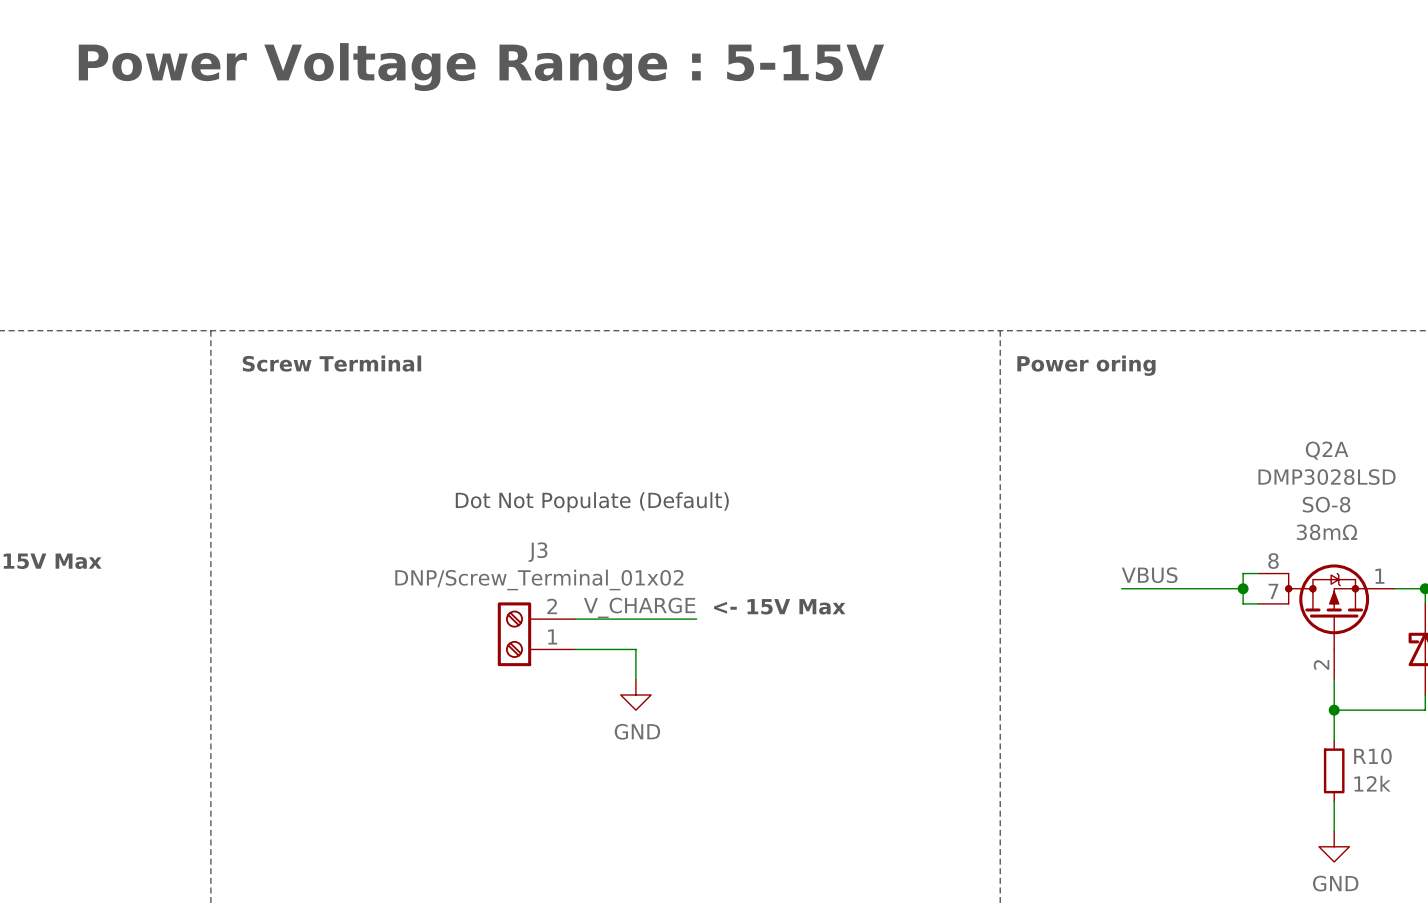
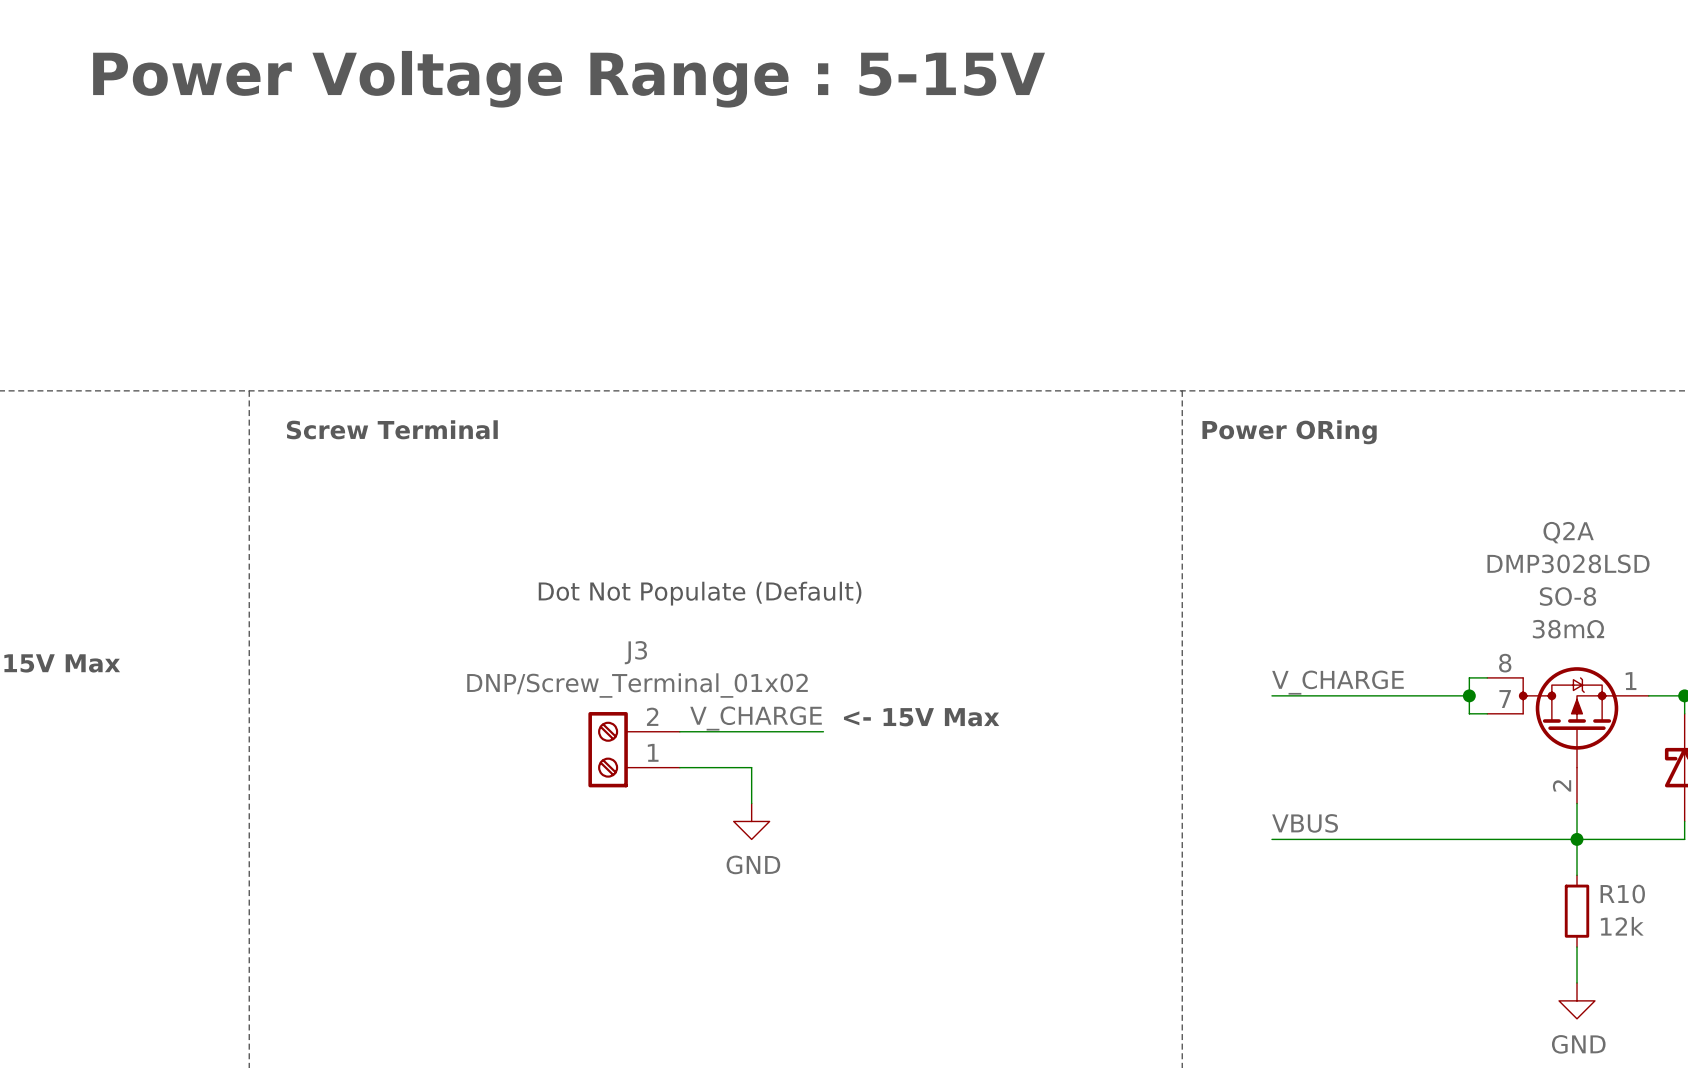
text: Power oring (1086, 365) -> Power ORing (1289, 432)
label position: VBUS (1149, 575) -> VBUS (1305, 823)
label: none -> V_CHARGE (1337, 682)
wire: none -> (1271, 695) (1325, 695)
wire: none -> (1271, 839) (1577, 839)

